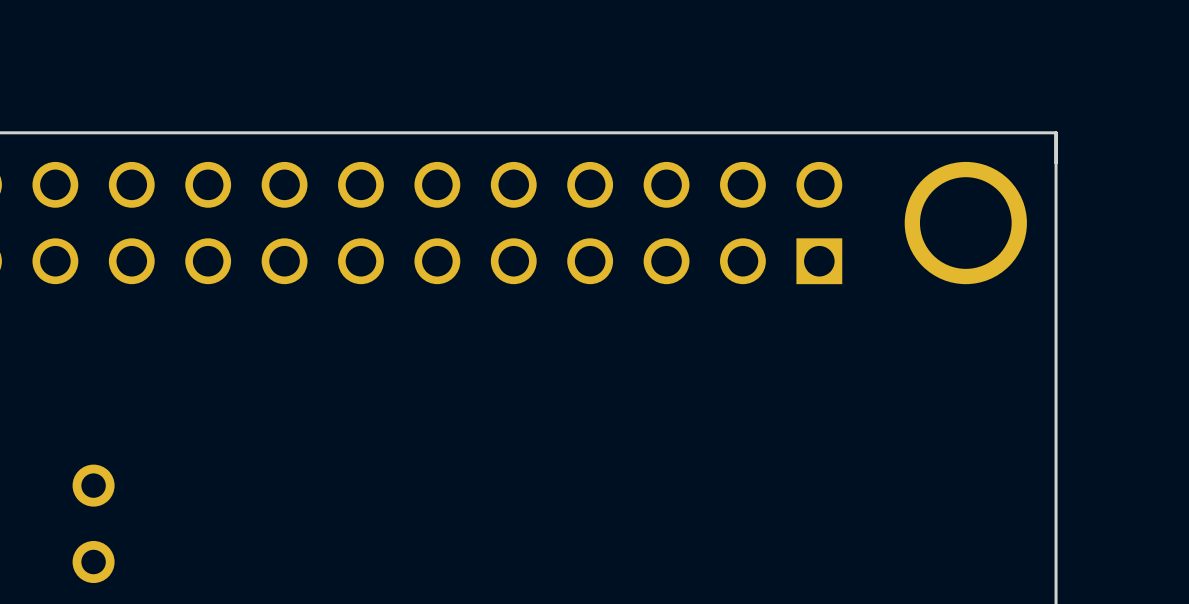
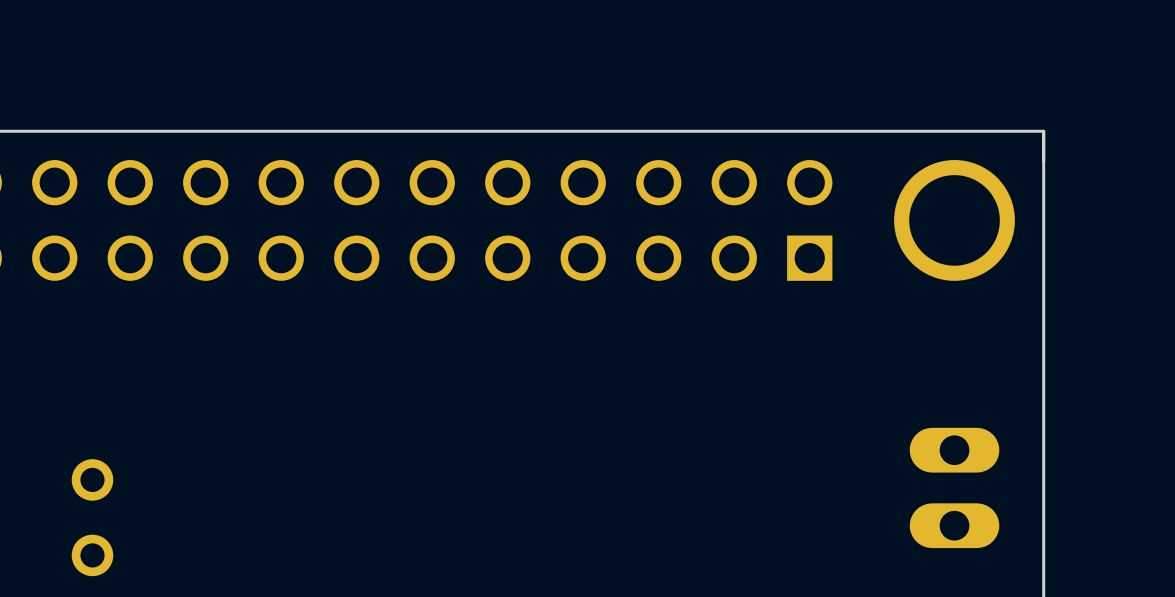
part: none -> (954, 487)

